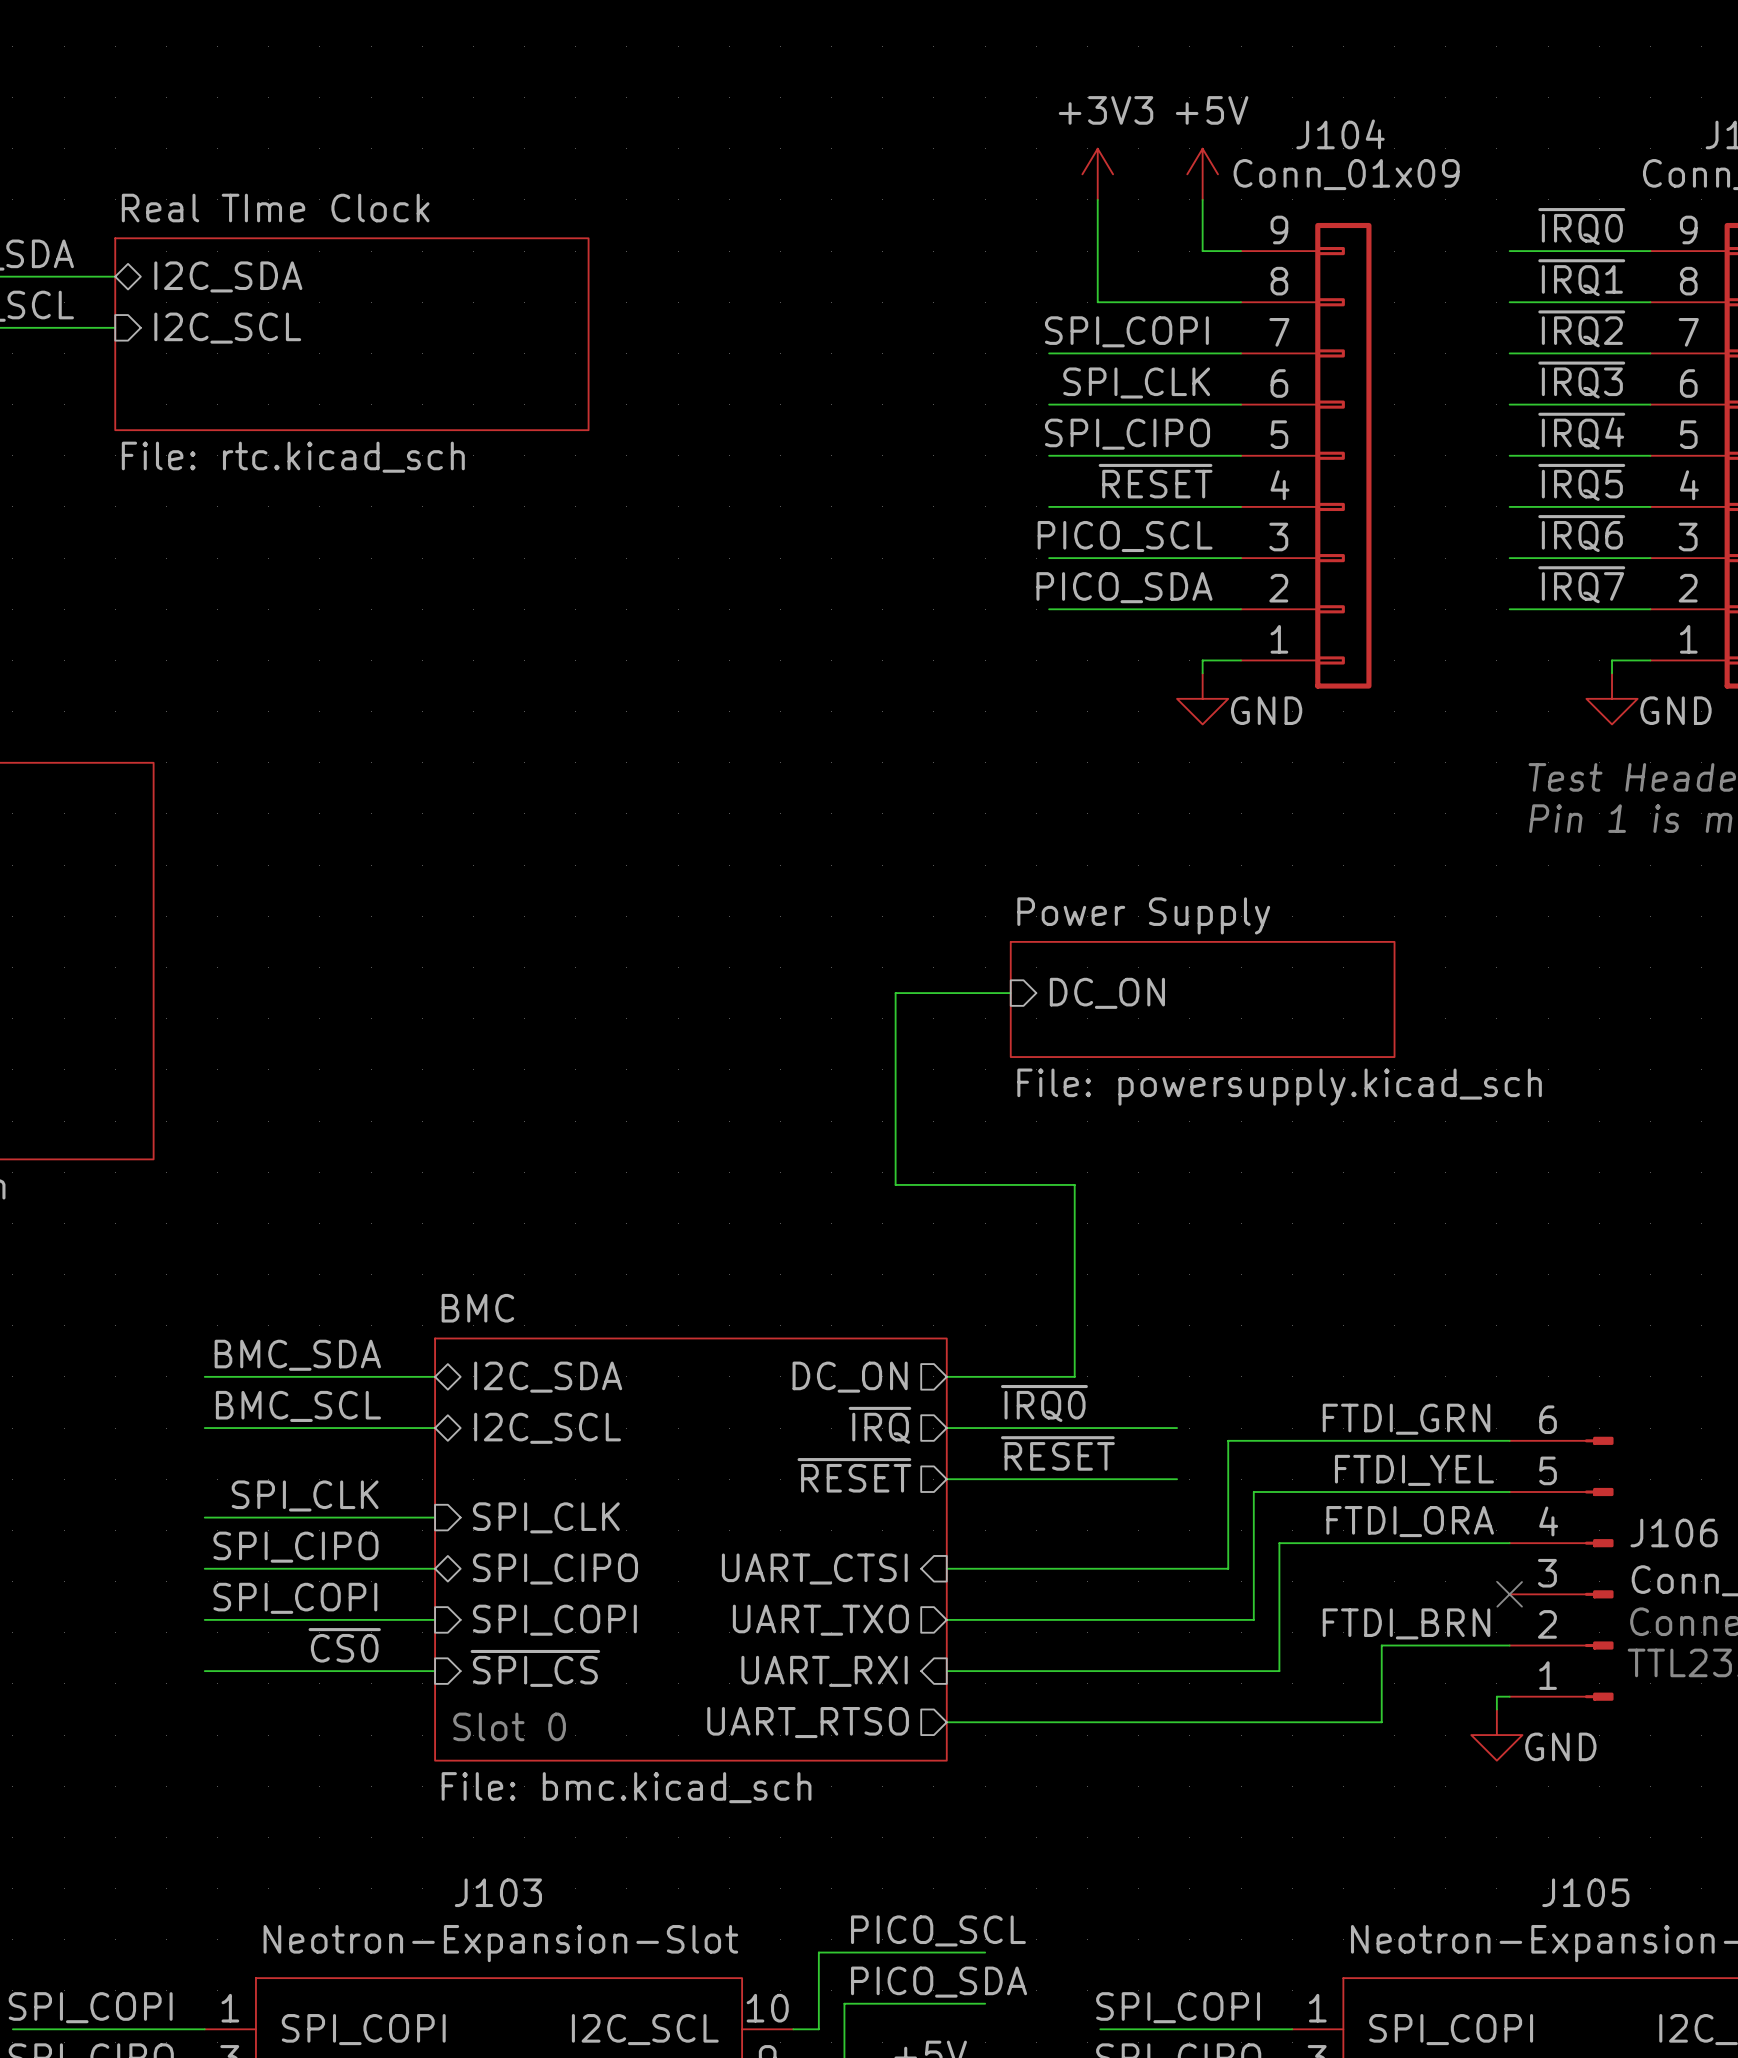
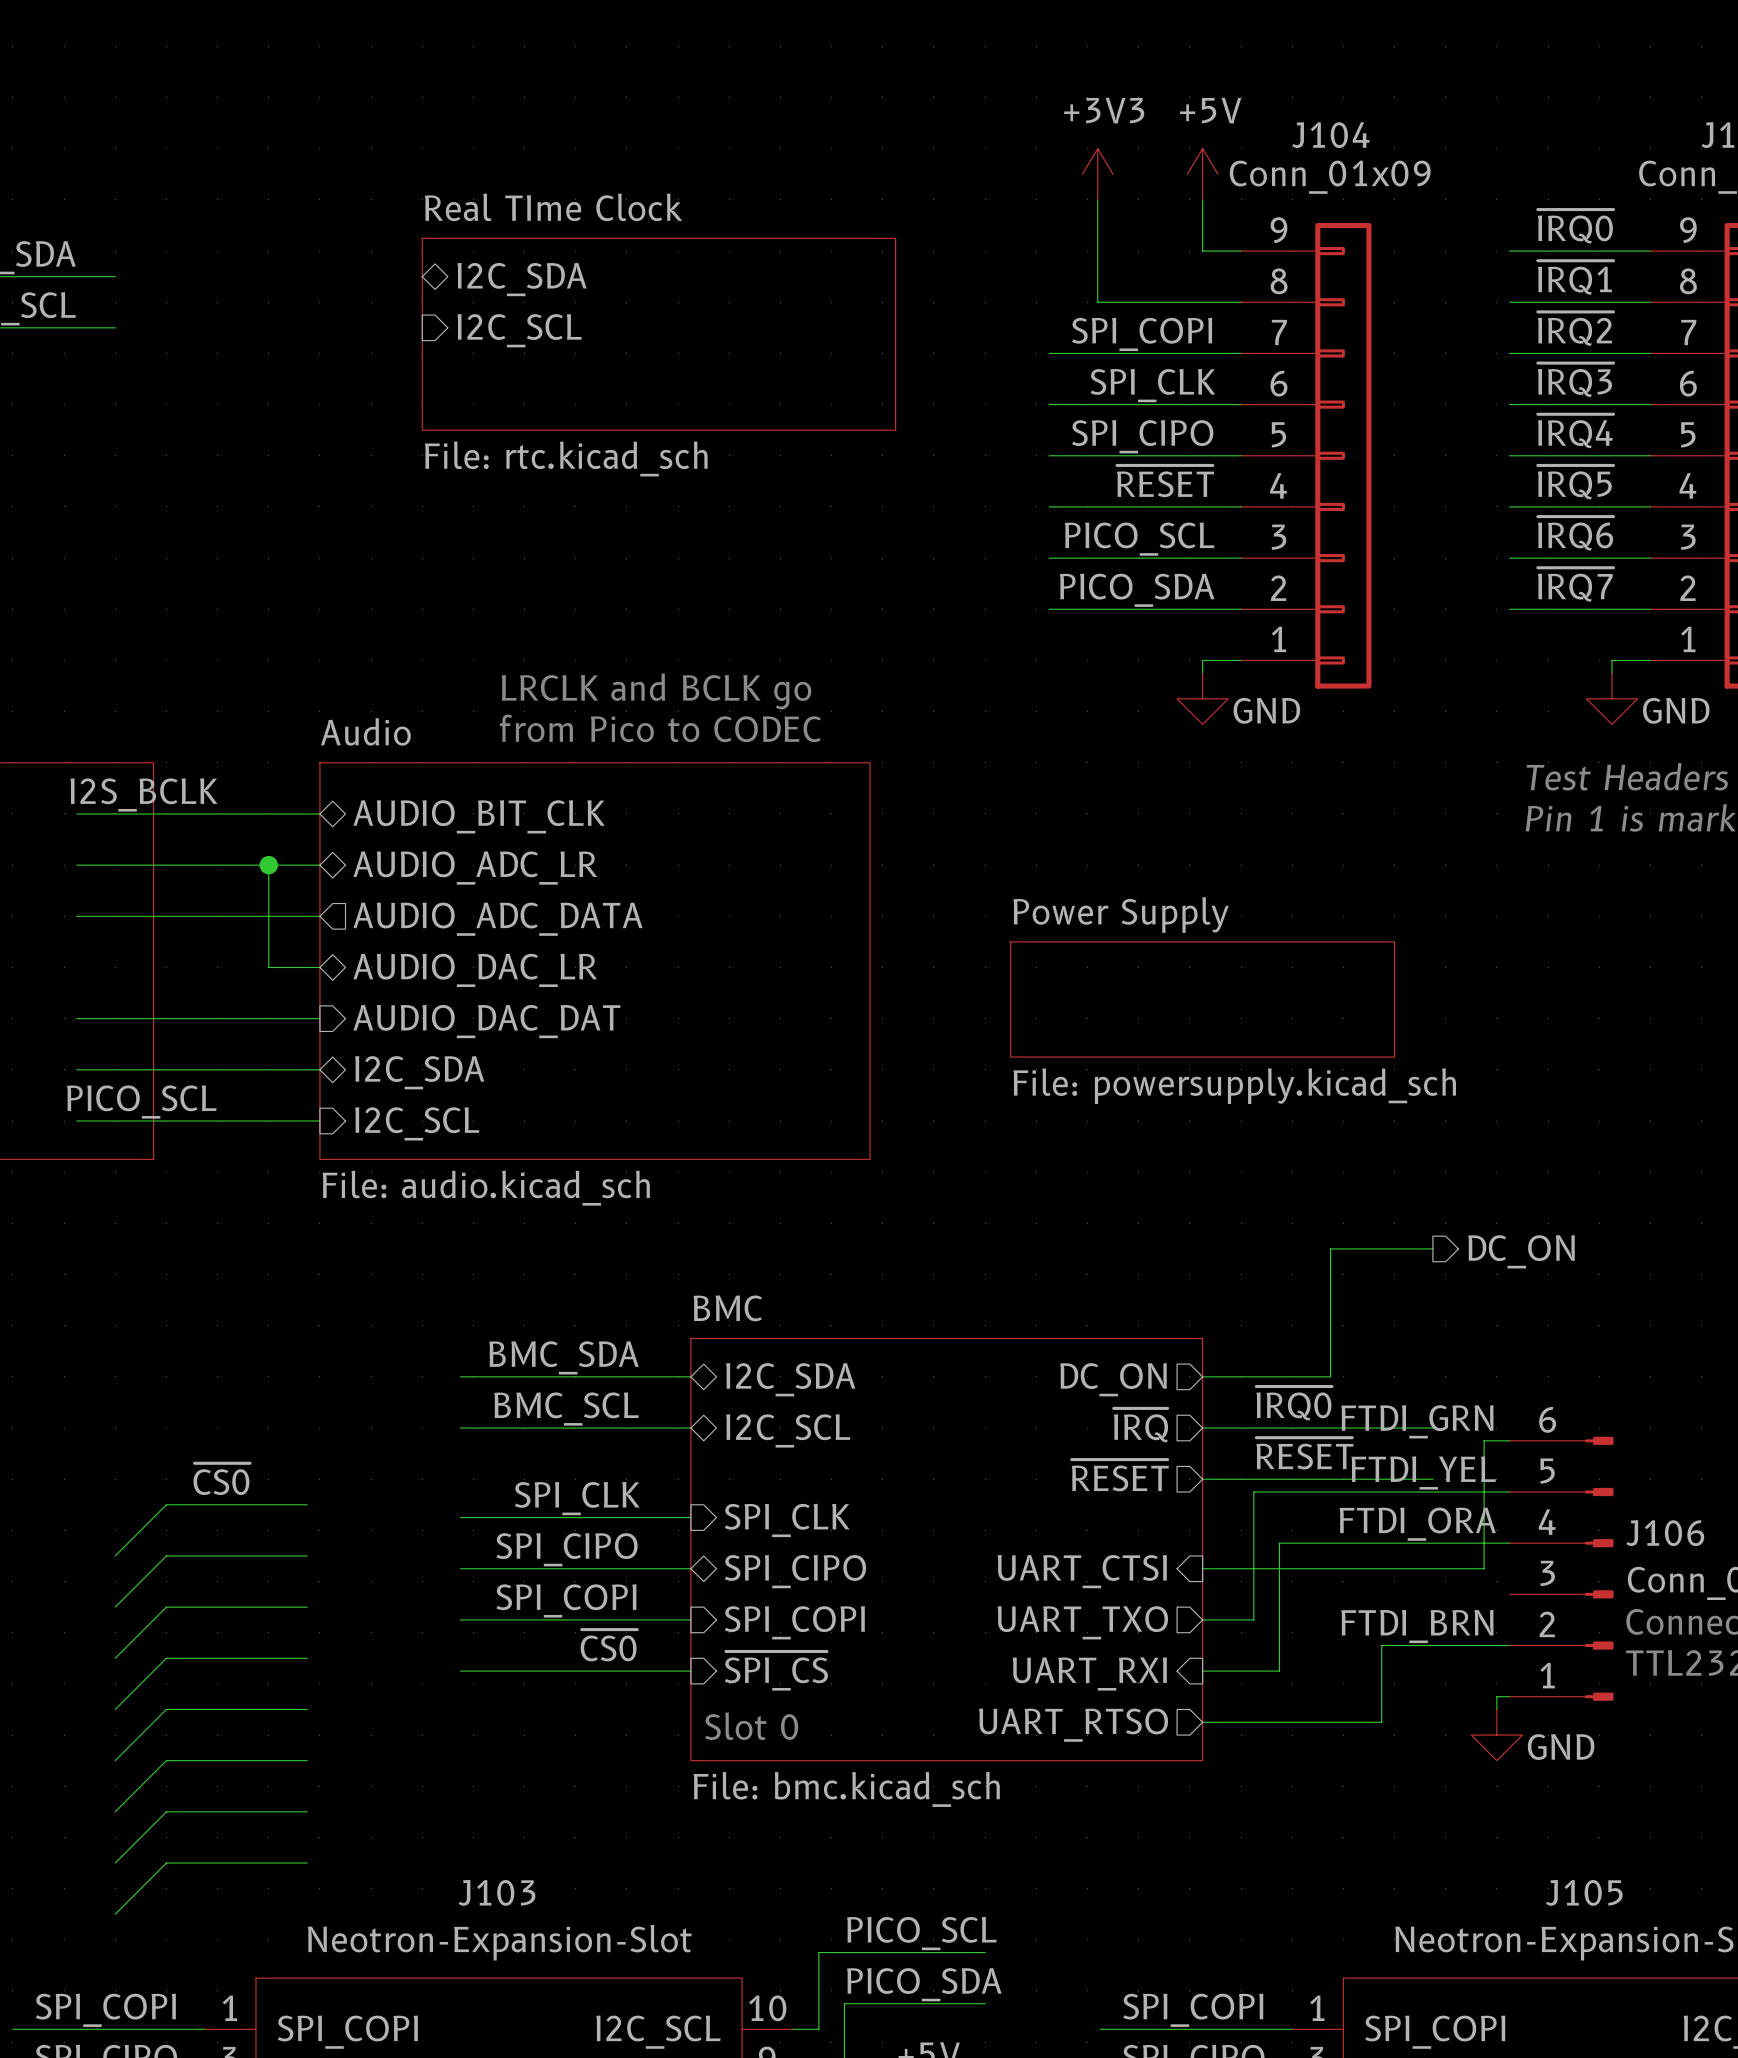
sheet pin position: I2C_SDA (228, 276) -> I2C_SDA (522, 279)
sheet pin position: I2C_SCL (227, 328) -> I2C_SCL (519, 330)
sheet Real TIme Clock position: (351, 334) -> (658, 334)
text: none -> LRCLK and BCLK go (656, 691)
text: none -> from Pico to CODEC (660, 728)
label: none -> I2S_BCLK (143, 794)
wire: none -> (76, 813) (319, 813)
sheet pin: none -> AUDIO_BIT_CLK (479, 816)
wire: none -> (76, 865) (319, 865)
wire: none -> (268, 865) (268, 967) (319, 967)
junction: none -> (268, 865)
sheet pin: none -> AUDIO_ADC_LR (475, 868)
wire: none -> (76, 916) (319, 916)
sheet pin: none -> AUDIO_ADC_DATA (498, 919)
sheet Audio: none -> File: audio.kicad_sch (594, 961)
sheet pin: none -> AUDIO_DAC_LR (475, 970)
wire: (1010, 993) (895, 993) (895, 1184) (1074, 1184) (1074, 1376) (946, 1376) -> none
sheet pin: DC_ON (1107, 993) -> none
wire: none -> (76, 1018) (319, 1018)
sheet pin: none -> AUDIO_DAC_DAT (486, 1021)
wire: none -> (76, 1069) (319, 1069)
sheet pin: none -> I2C_SDA (419, 1072)
label: none -> PICO_SCL (141, 1102)
wire: none -> (76, 1121) (319, 1121)
sheet pin: none -> I2C_SCL (417, 1123)
wire: none -> (1432, 1248) (1330, 1248) (1330, 1376) (1202, 1376)
sheet pin: none -> DC_ON (1521, 1251)
label position: BMC_SDA (297, 1355) -> BMC_SDA (563, 1357)
wire: (204, 1376) (435, 1376) -> (460, 1376) (690, 1376)
sheet pin: I2C_SDA (548, 1377) -> none
sheet pin: none -> I2C_SDA (790, 1379)
sheet pin: DC_ON (850, 1377) -> none
sheet pin: none -> DC_ON (1113, 1379)
label position: ~{IRQ0} (1044, 1403) -> ~{IRQ0} (1294, 1403)
label position: BMC_SCL (298, 1406) -> BMC_SCL (566, 1409)
sheet pin position: ~{IRQ} (879, 1425) -> ~{IRQ} (1140, 1425)
wire: (204, 1428) (435, 1428) -> (460, 1428) (690, 1428)
sheet pin: I2C_SCL (547, 1428) -> none
sheet pin: none -> I2C_SCL (788, 1430)
wire: (946, 1428) (1177, 1428) -> (1202, 1428) (1432, 1428)
wire: (1484, 1440) (1228, 1440) (1228, 1568) -> (1484, 1440) (1484, 1568) (1228, 1568)
label position: ~{RESET} (1057, 1453) -> ~{RESET} (1304, 1453)
sheet pin position: ~{RESET} (854, 1475) -> ~{RESET} (1120, 1475)
label: none -> ~{CS0} (221, 1479)
wire: (946, 1479) (1177, 1479) -> (1202, 1479) (1432, 1479)
label position: SPI_CLK (305, 1495) -> SPI_CLK (577, 1498)
wire: none -> (307, 1504) (166, 1504) (115, 1555)
wire: (204, 1517) (435, 1517) -> (460, 1517) (690, 1517)
sheet pin position: SPI_CLK (546, 1517) -> SPI_CLK (787, 1520)
label position: SPI_CIPO (295, 1547) -> SPI_CIPO (567, 1549)
sheet BMC position: (690, 1549) -> (946, 1549)
wire: none -> (307, 1555) (166, 1555) (115, 1607)
wire: (204, 1568) (435, 1568) -> (460, 1568) (690, 1568)
wire: (946, 1568) (1202, 1568) -> none
sheet pin position: SPI_CIPO (555, 1569) -> SPI_CIPO (795, 1571)
sheet pin position: UART_CTSI (814, 1569) -> UART_CTSI (1082, 1571)
no-connect mark: (1509, 1594) -> none
label position: SPI_COPI (295, 1598) -> SPI_COPI (566, 1600)
wire: none -> (307, 1607) (166, 1607) (115, 1658)
wire: (204, 1619) (435, 1619) -> (460, 1619) (690, 1619)
wire: (946, 1619) (1202, 1619) -> none
sheet pin position: SPI_COPI (554, 1620) -> SPI_COPI (794, 1622)
sheet pin position: UART_TXO (820, 1620) -> UART_TXO (1082, 1622)
label: ~{CS0} (344, 1645) -> none
label: none -> ~{CS0} (608, 1645)
wire: none -> (307, 1658) (166, 1658) (115, 1709)
sheet pin position: ~{SPI_CS} (535, 1668) -> ~{SPI_CS} (776, 1671)
wire: (204, 1671) (435, 1671) -> (460, 1671) (690, 1671)
sheet pin position: UART_RXI (824, 1671) -> UART_RXI (1089, 1673)
wire: (946, 1671) (1202, 1671) -> none
wire: none -> (307, 1709) (166, 1709) (115, 1760)
sheet pin position: UART_RTSO (808, 1722) -> UART_RTSO (1073, 1725)
wire: (946, 1722) (1202, 1722) -> none
text position: Slot 0 (509, 1726) -> Slot 0 (751, 1726)
wire: none -> (307, 1760) (166, 1760) (115, 1811)
wire: none -> (307, 1811) (166, 1811) (115, 1862)
wire: none -> (307, 1862) (166, 1862) (115, 1914)

